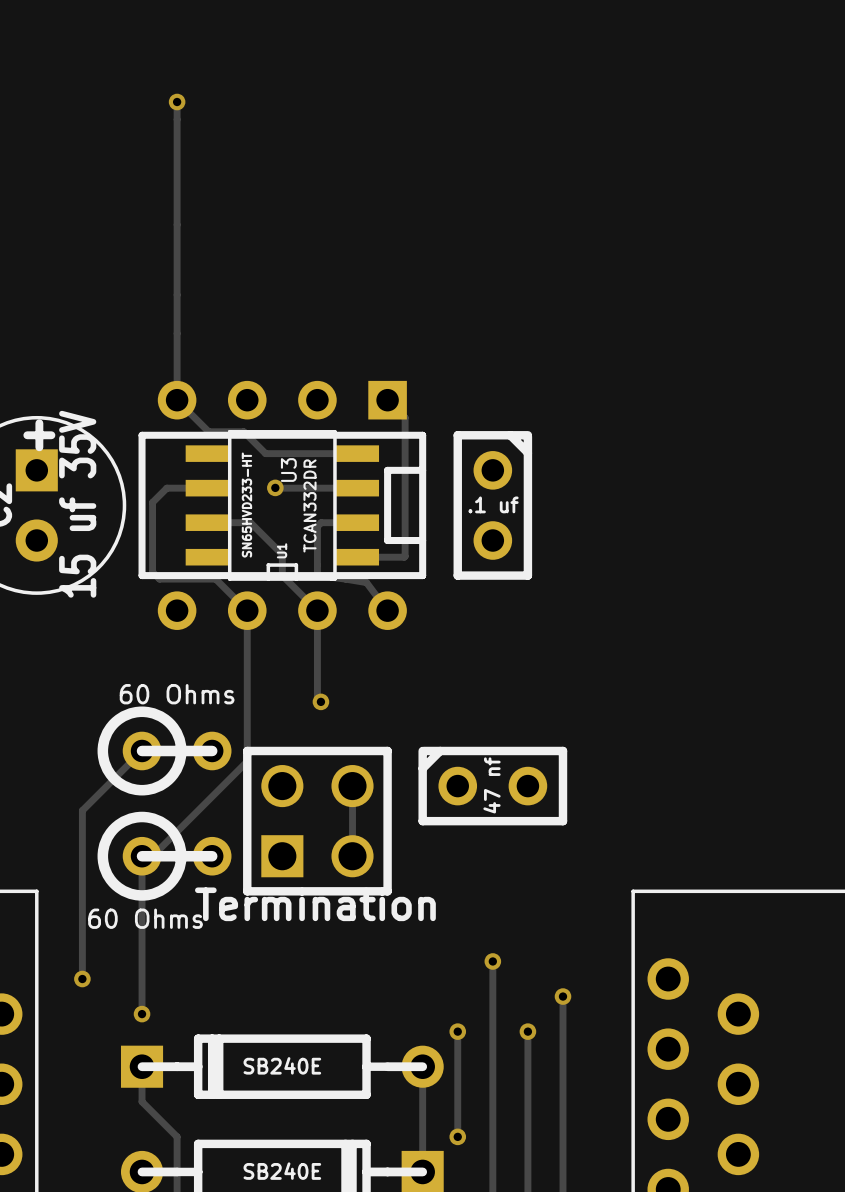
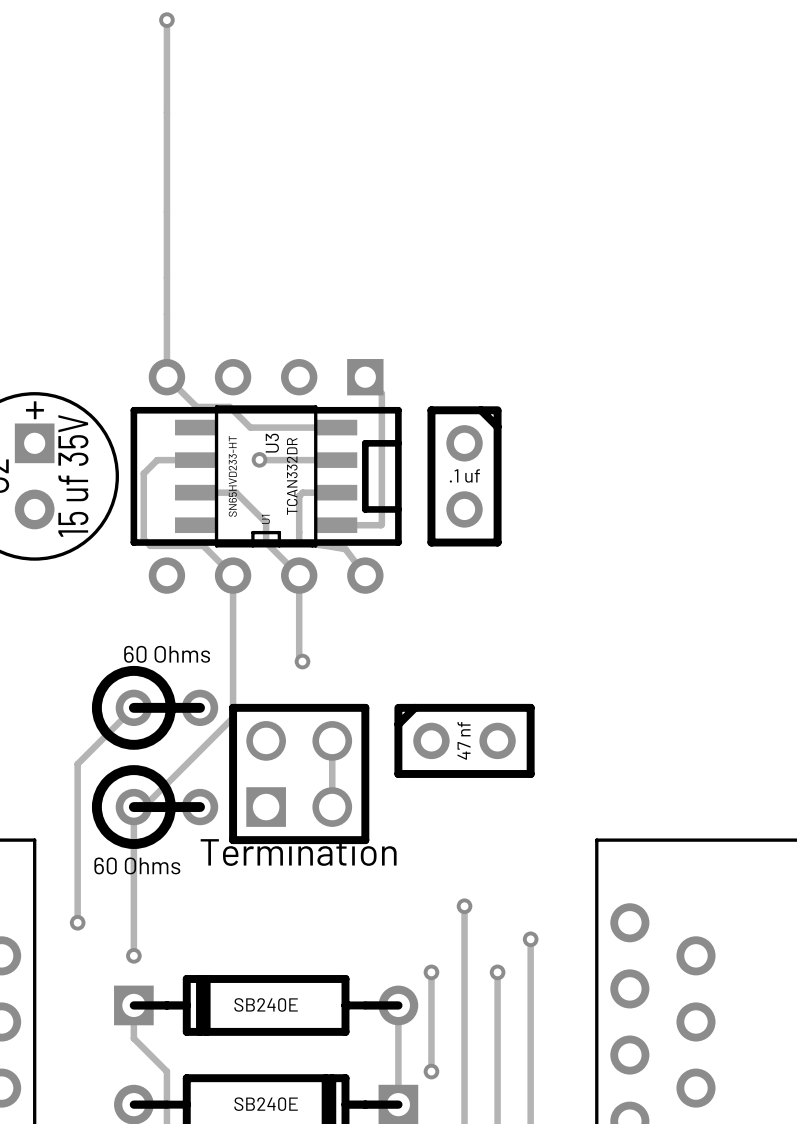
track: none -> (166, 20) (166, 96)
via position: (177, 102) -> (166, 20)

